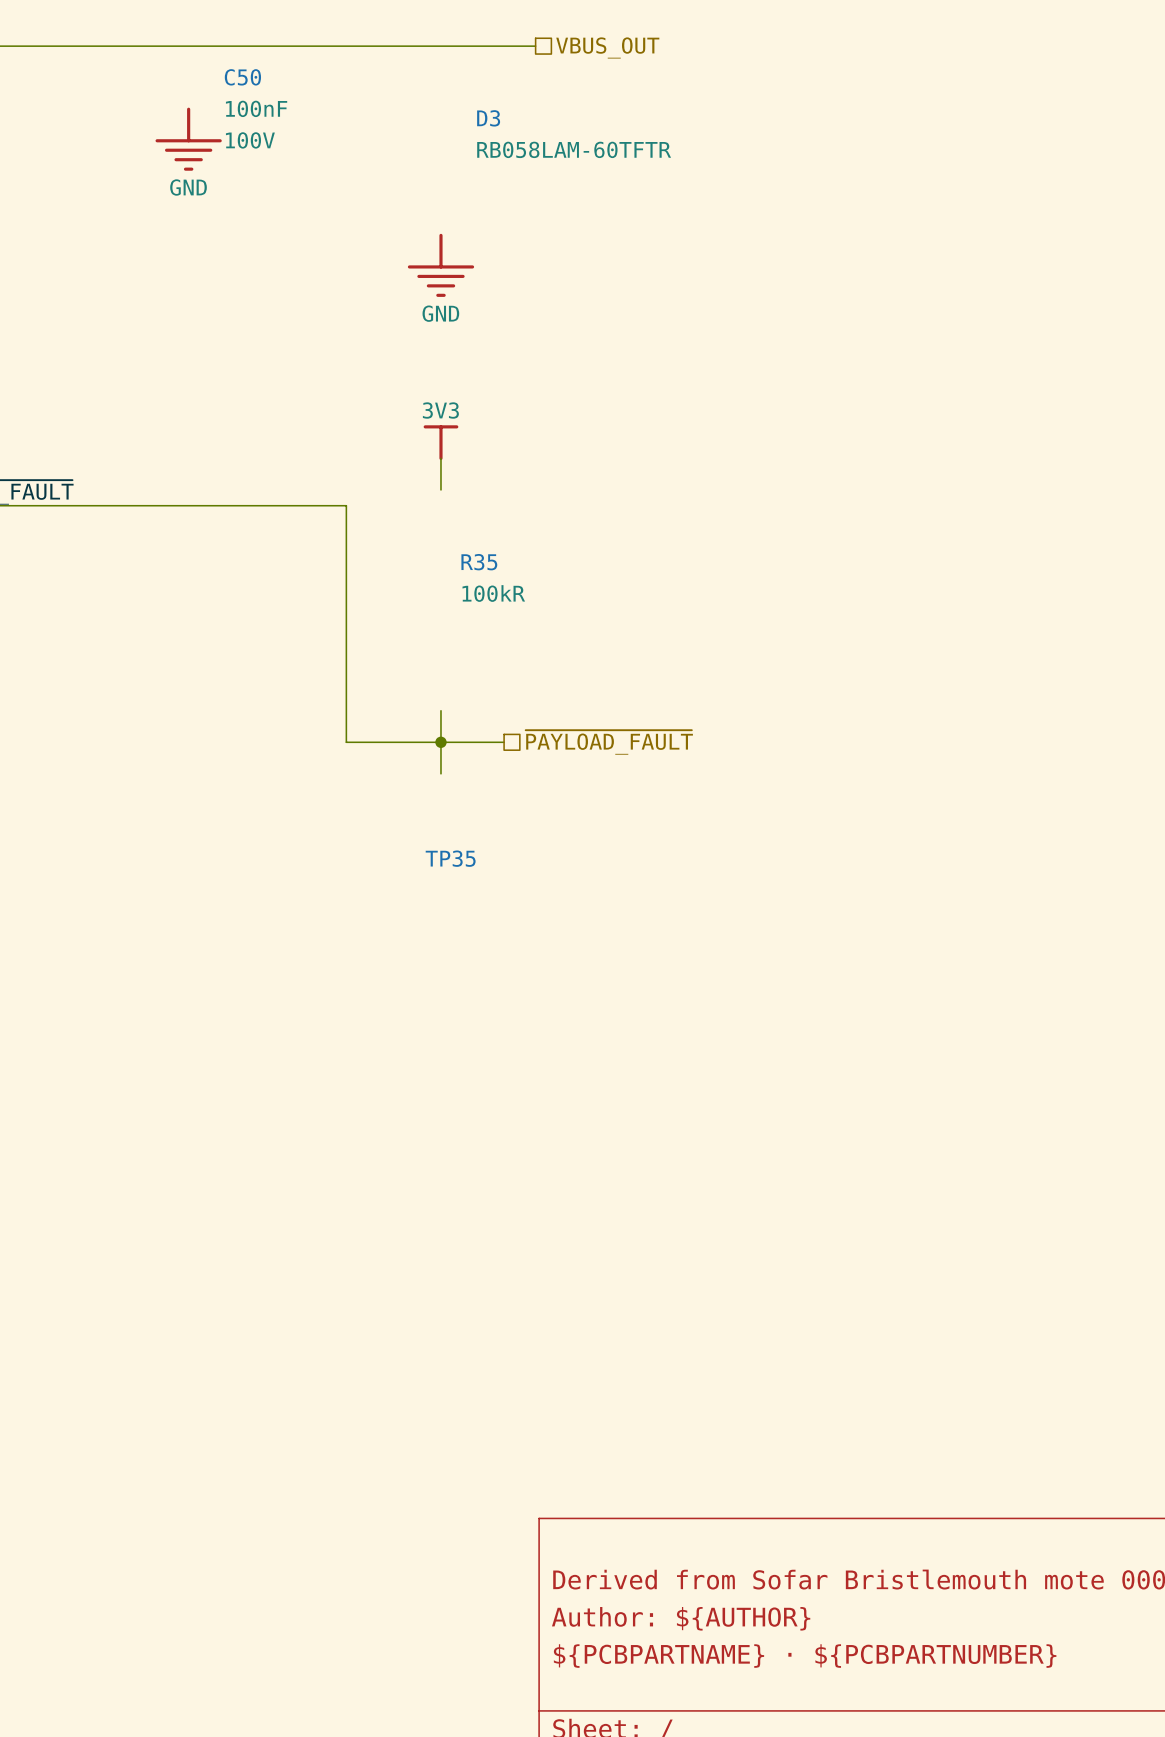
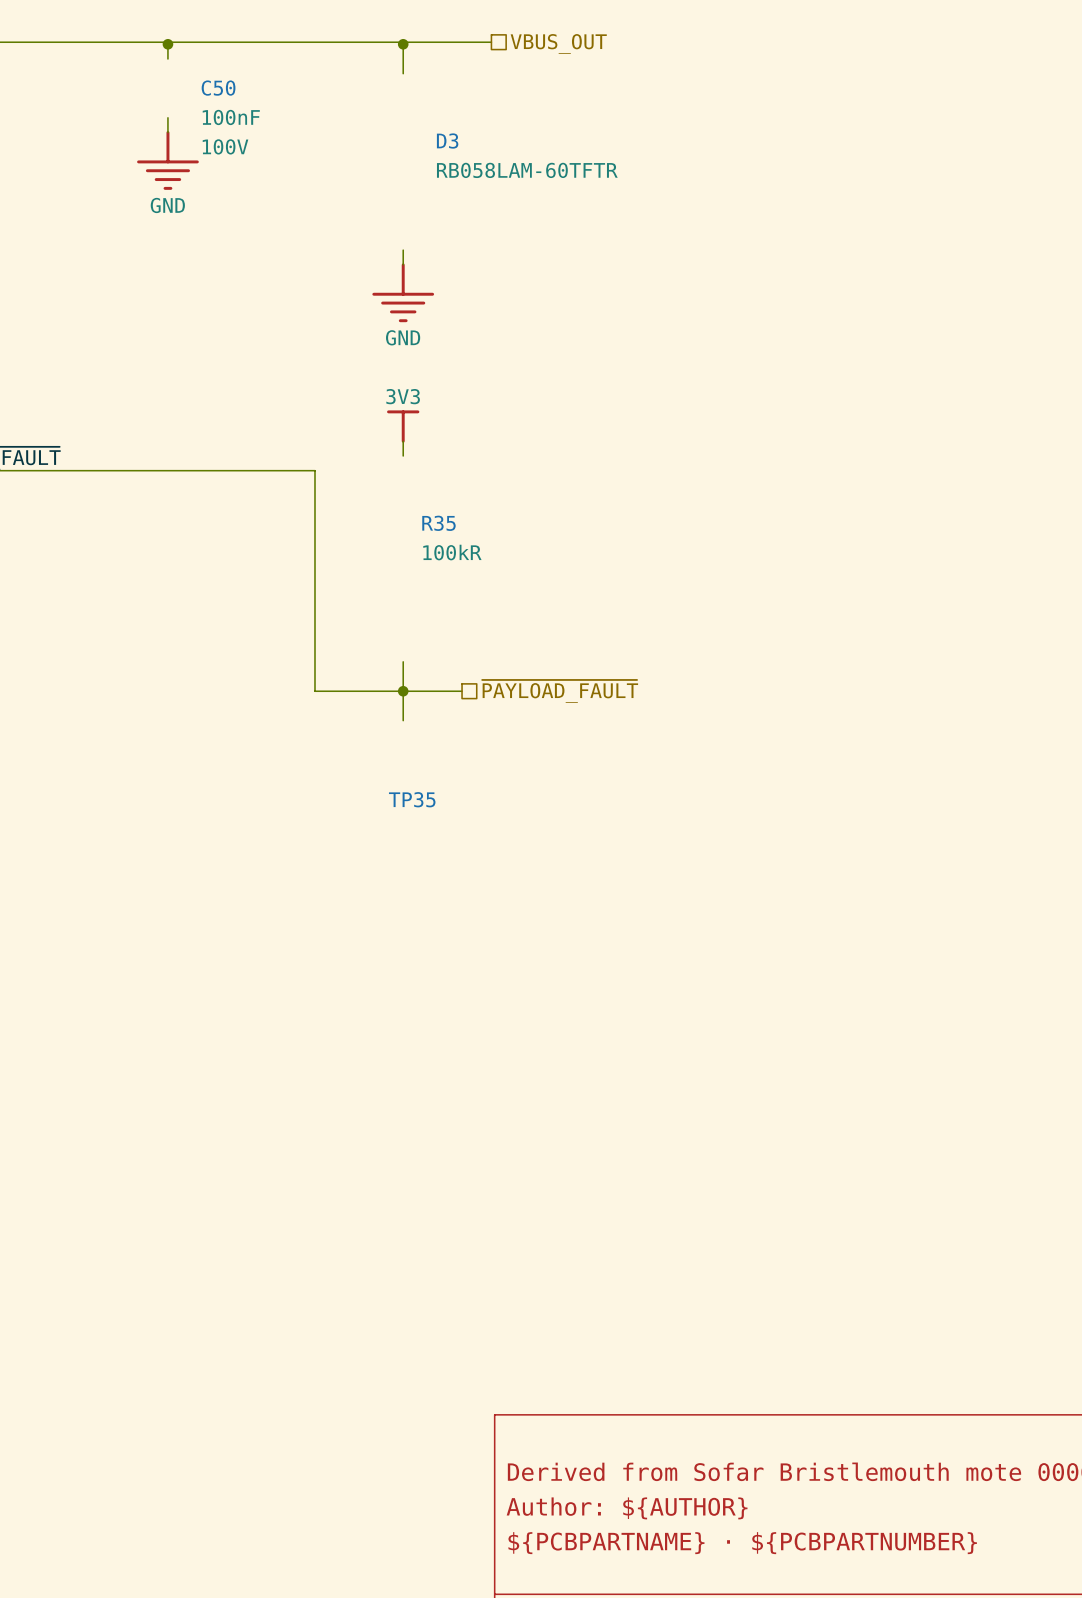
wire: none -> (167, 44) (167, 58)
junction: none -> (167, 44)
wire: none -> (403, 44) (403, 73)
junction: none -> (403, 44)
C50 position: (256, 108) -> (230, 117)
D3 position: (574, 134) -> (527, 155)
power symbol position: GND (188, 139) -> GND (167, 160)
power symbol position: GND (440, 265) -> GND (403, 292)
power symbol position: 3V3 (440, 442) -> 3V3 (403, 426)

